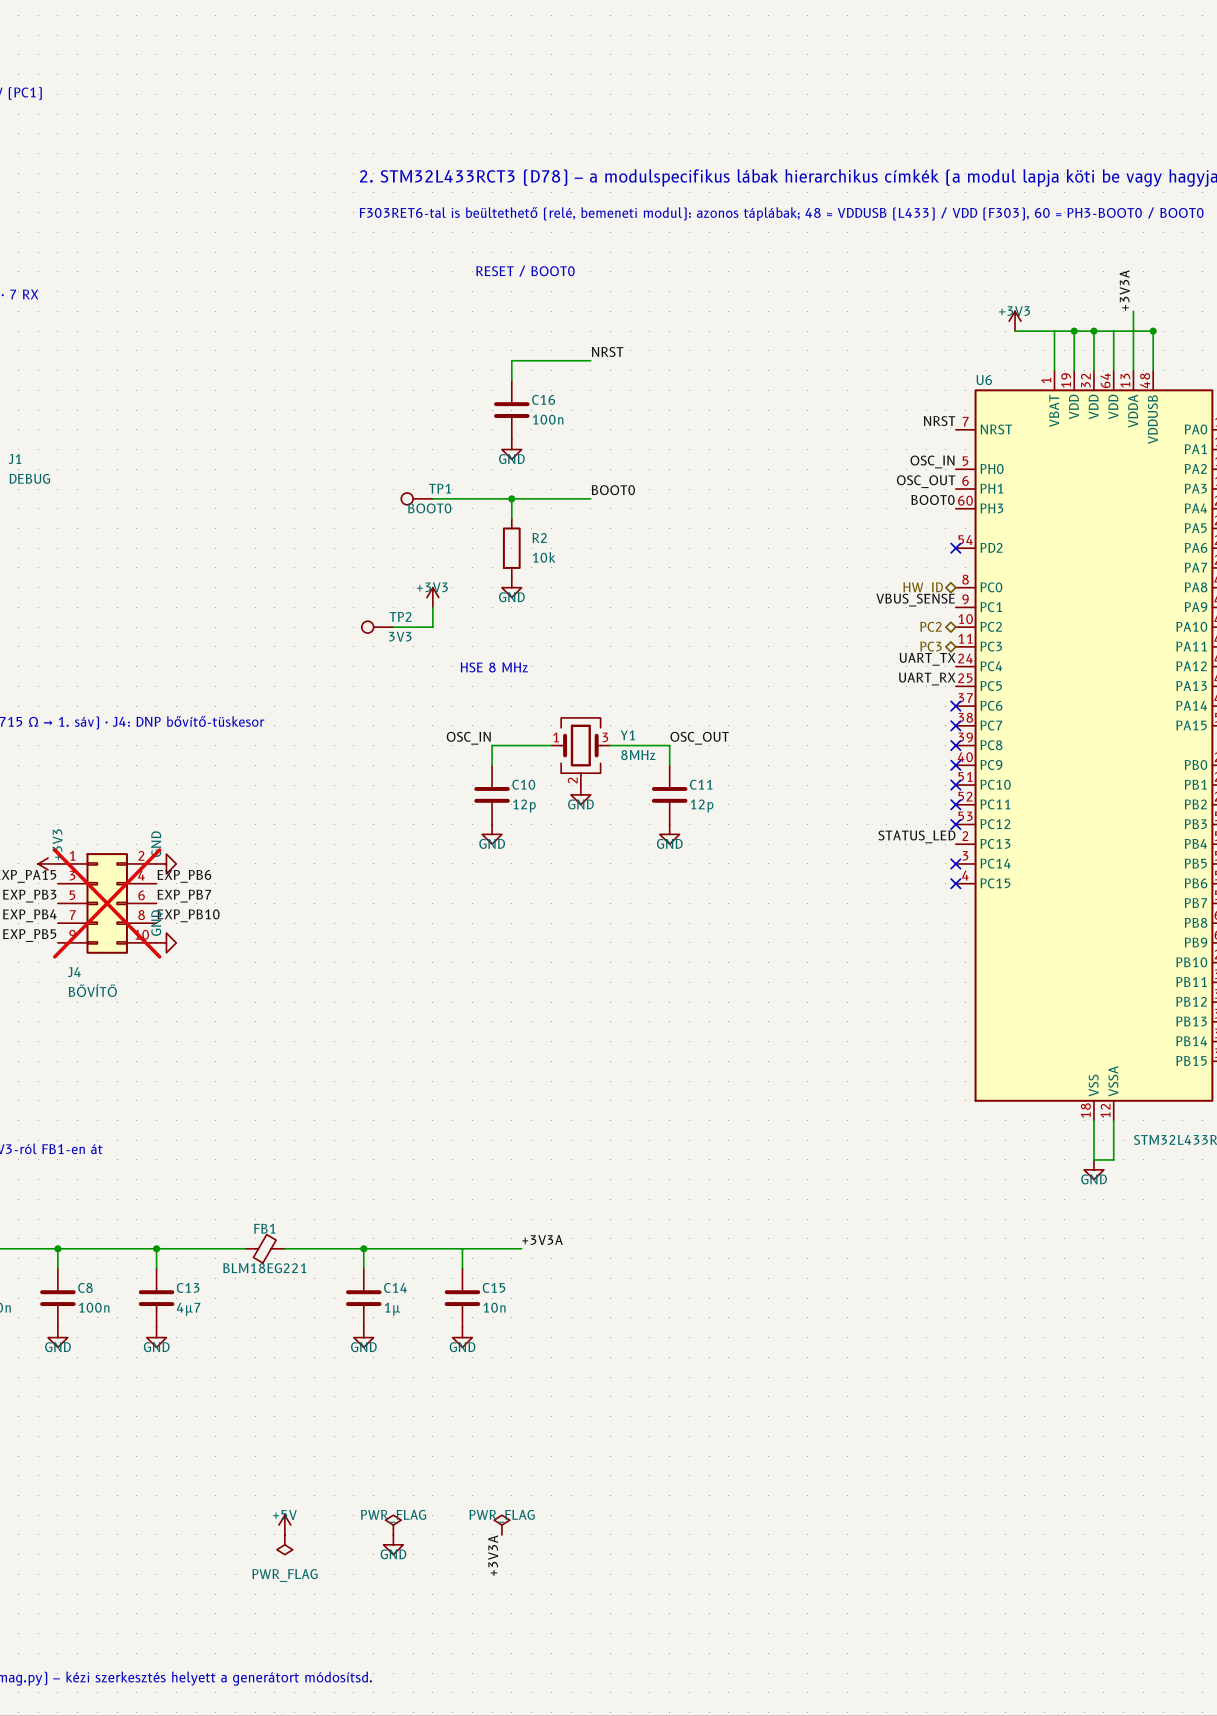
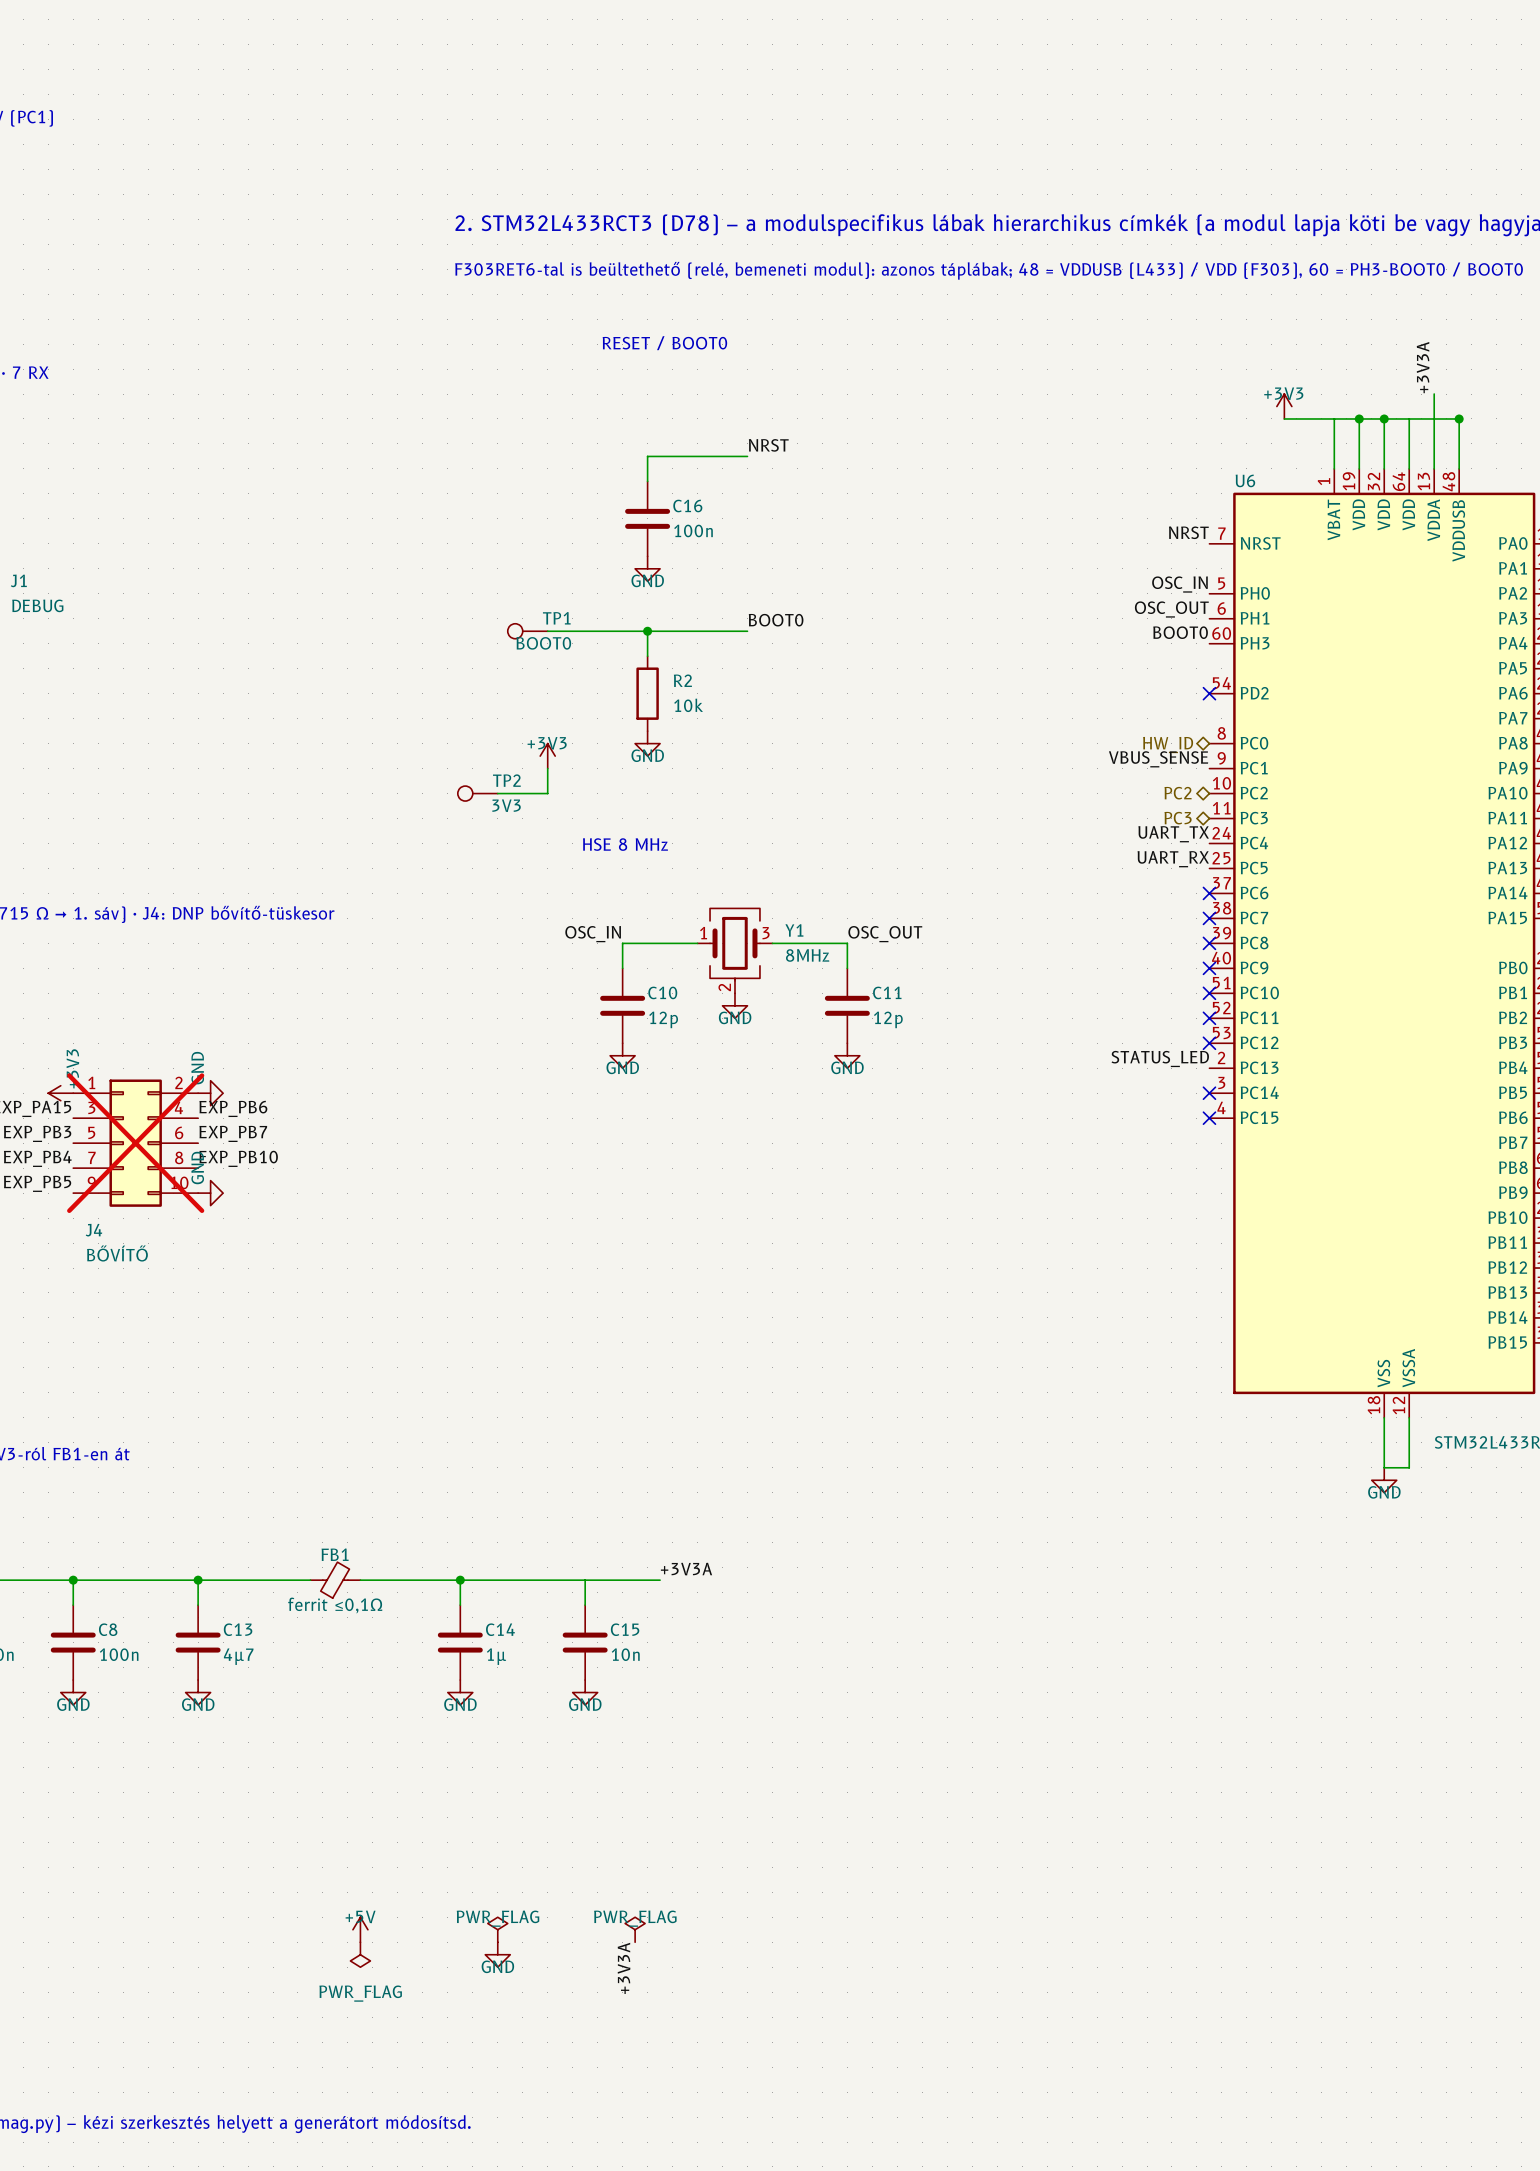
FB1 value: BLM18EG221 (264, 1268) -> ferrit ≤0,1Ω (335, 1605)

